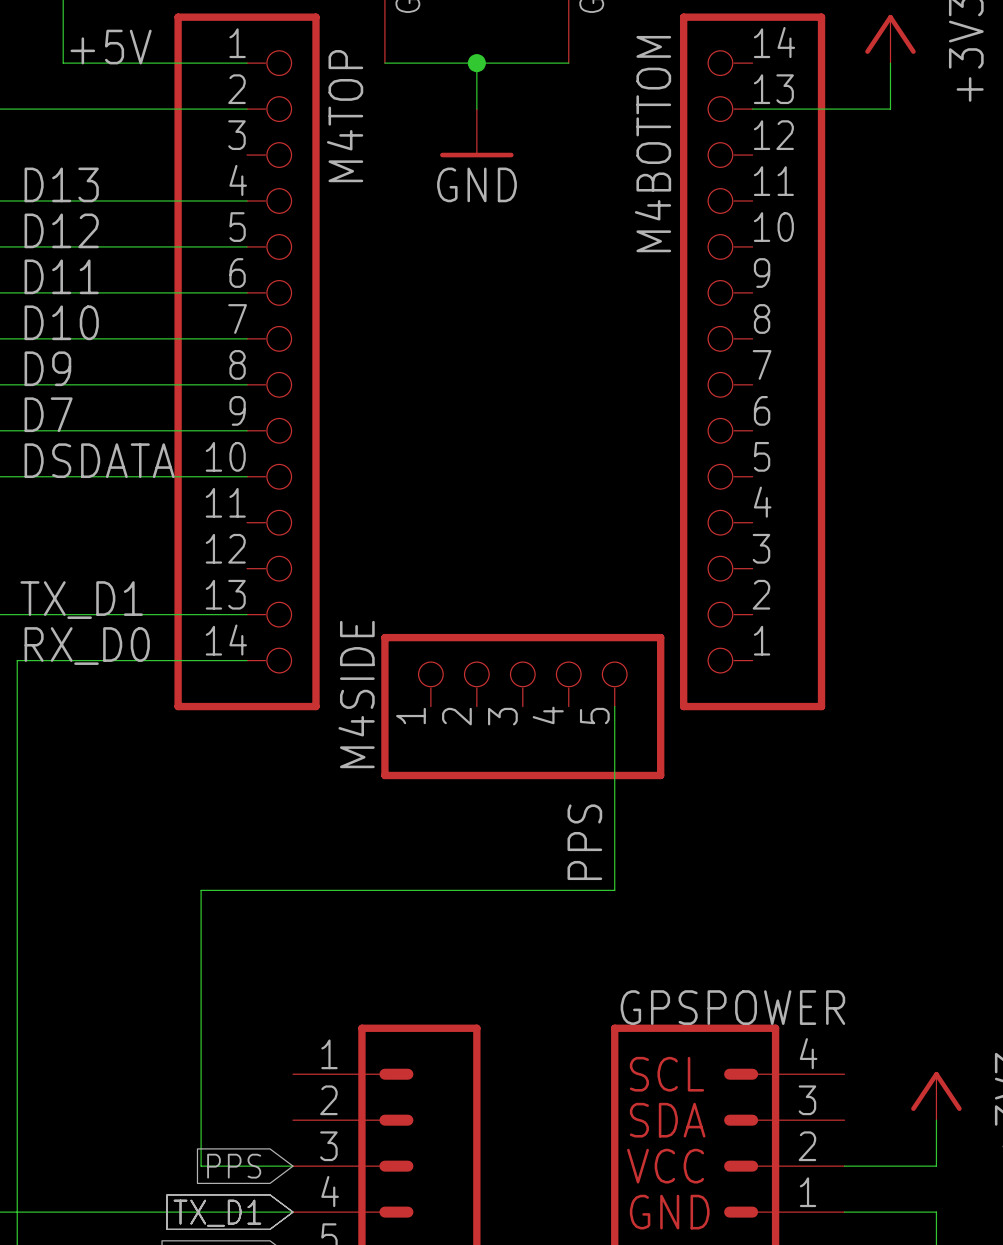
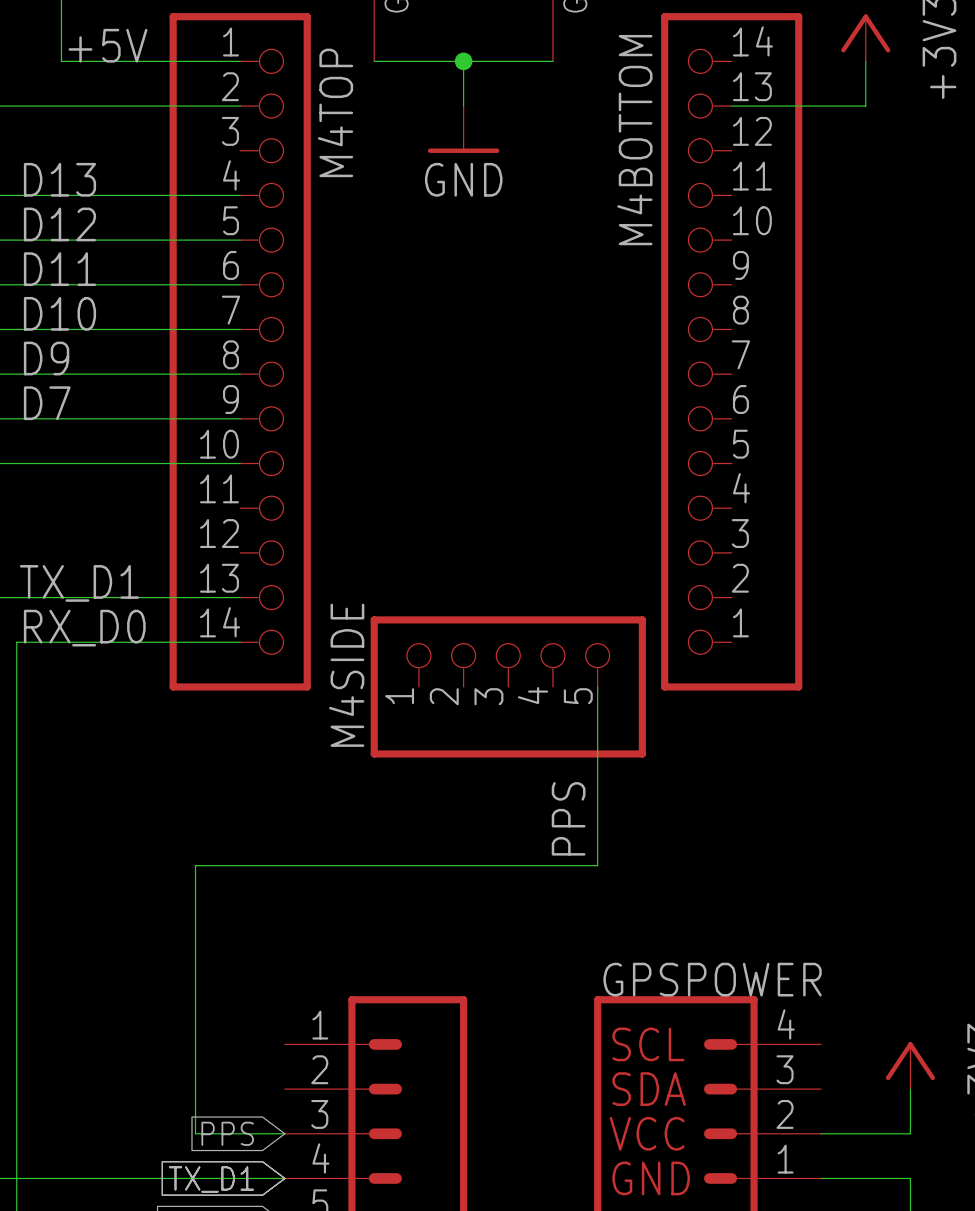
label: DSDATA (99, 460) -> none

